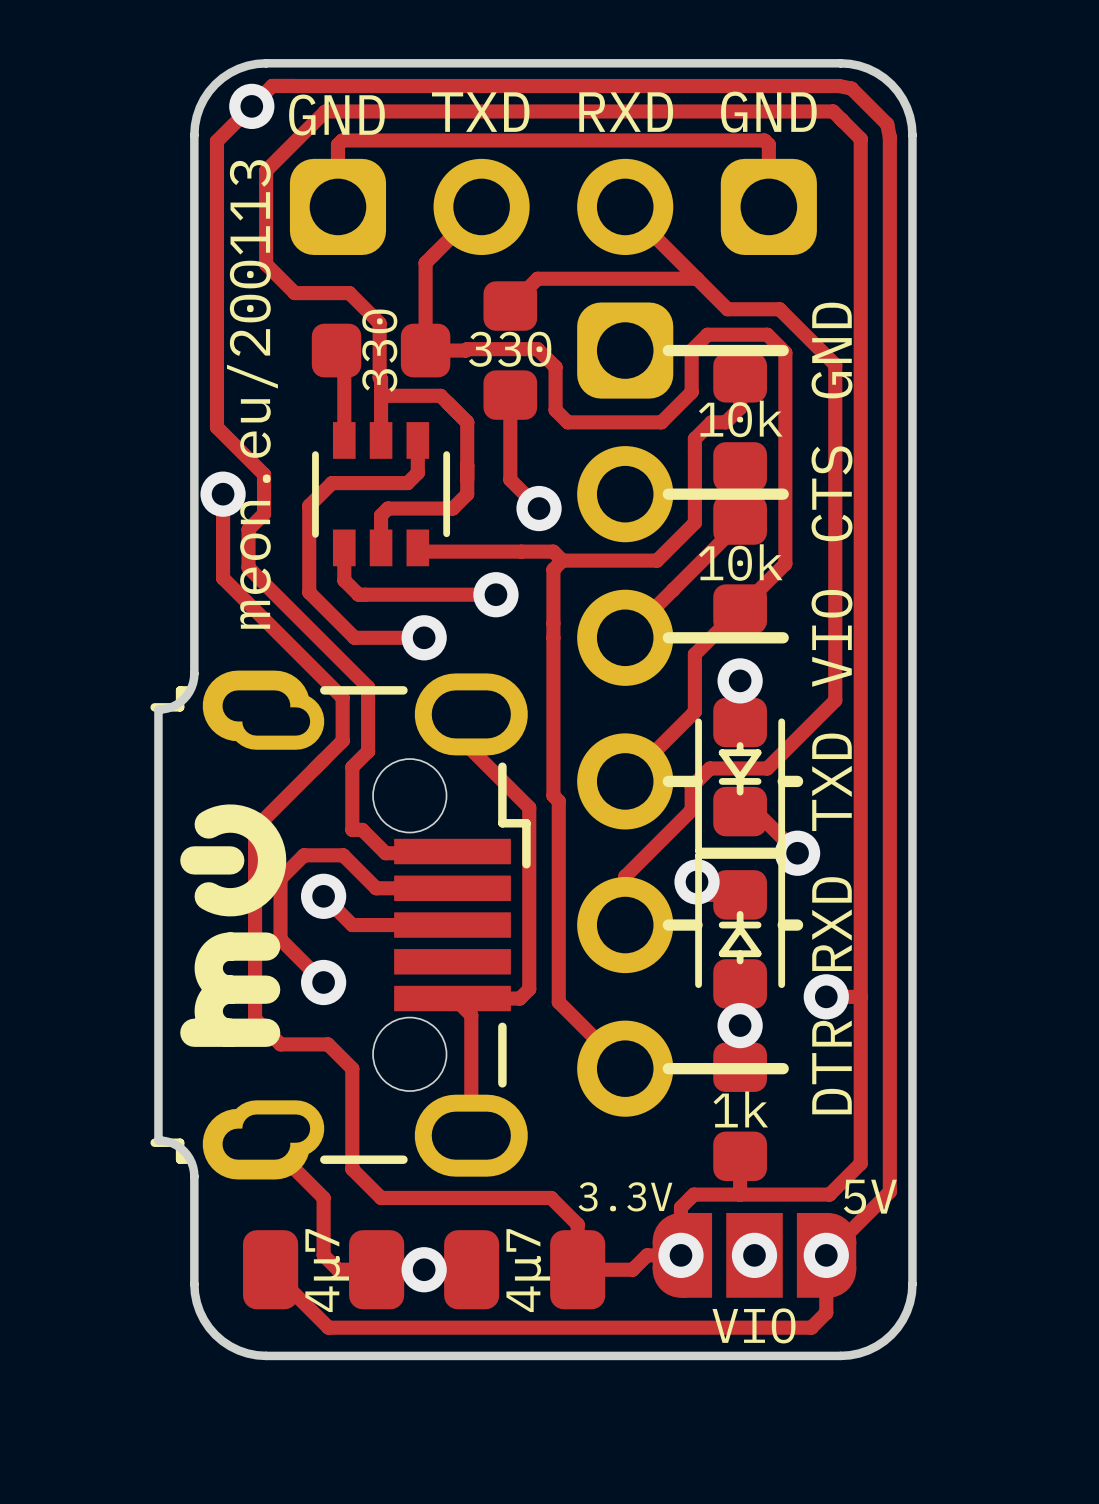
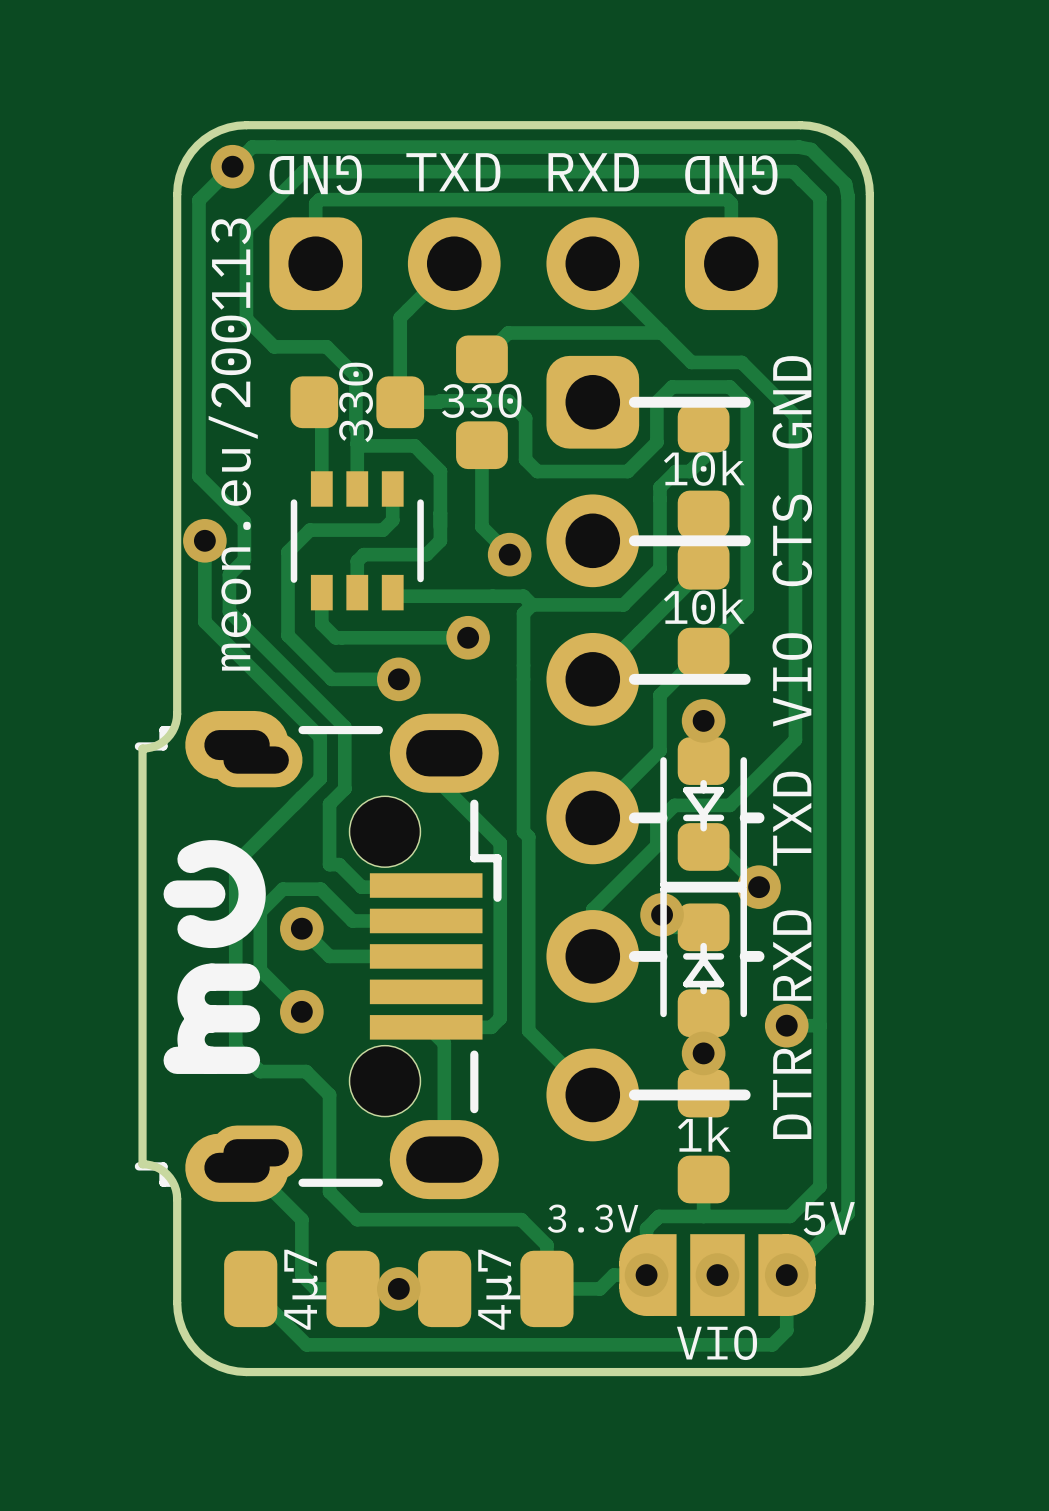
text rotation: 0° (768, 112) -> 180° (731, 175)
text rotation: 0° (336, 115) -> 180° (315, 175)

